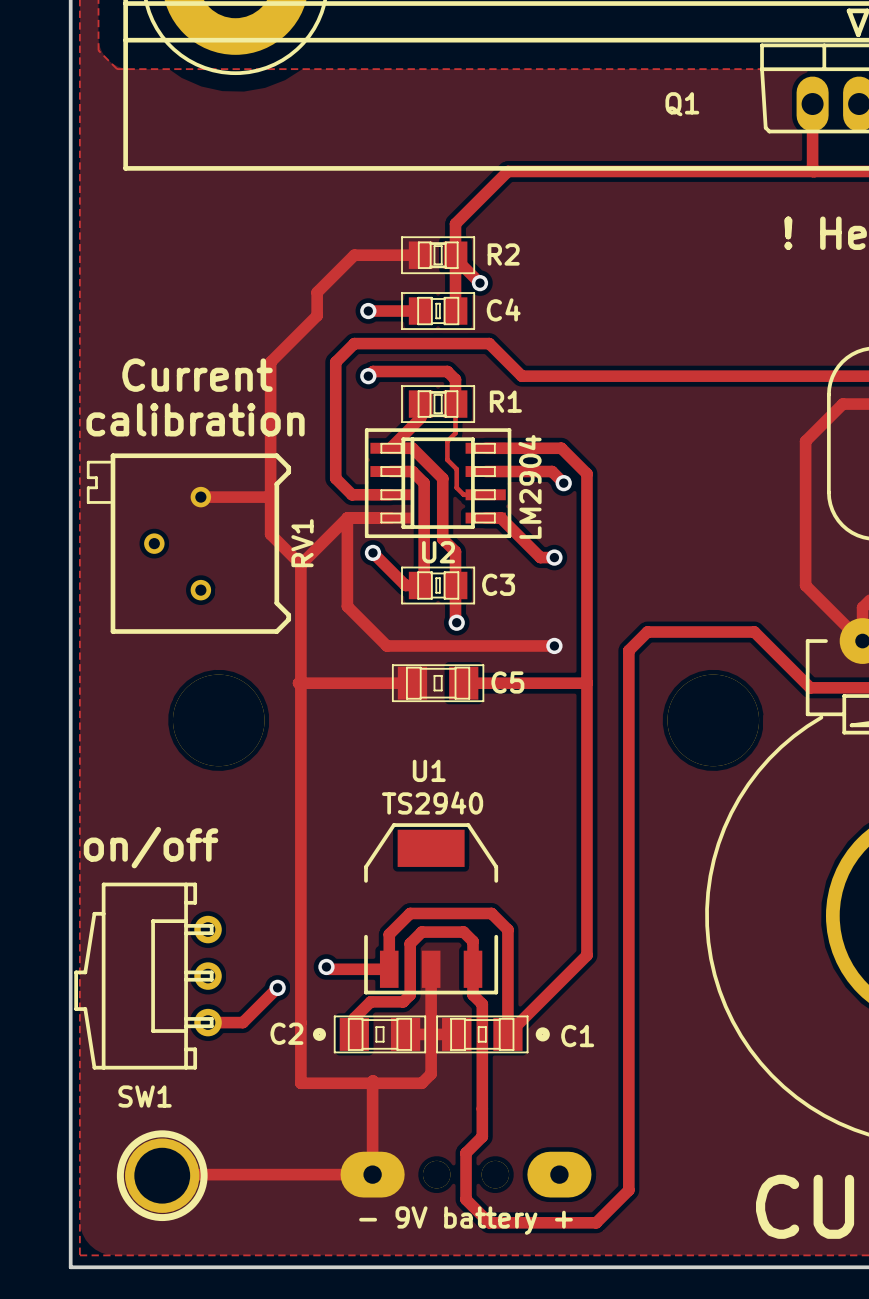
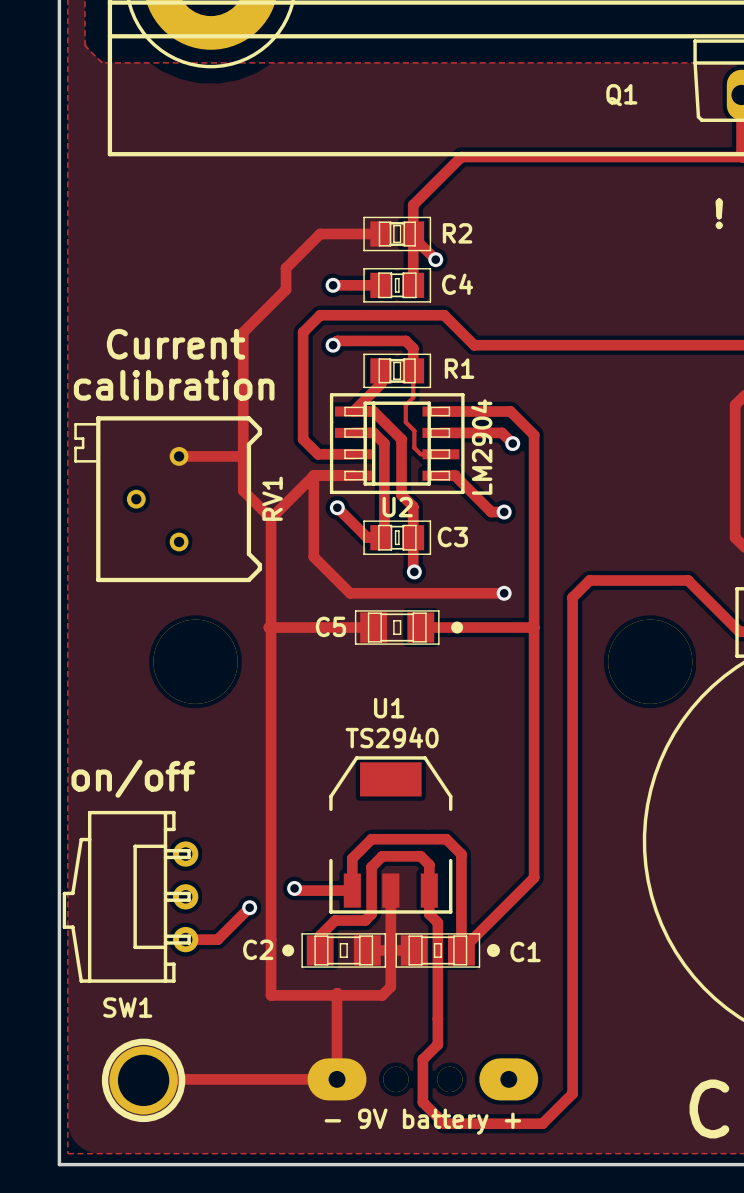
drawing: none -> [451, 621, 464, 634]
C5 name position: C5 (507, 682) -> C5 (330, 626)

